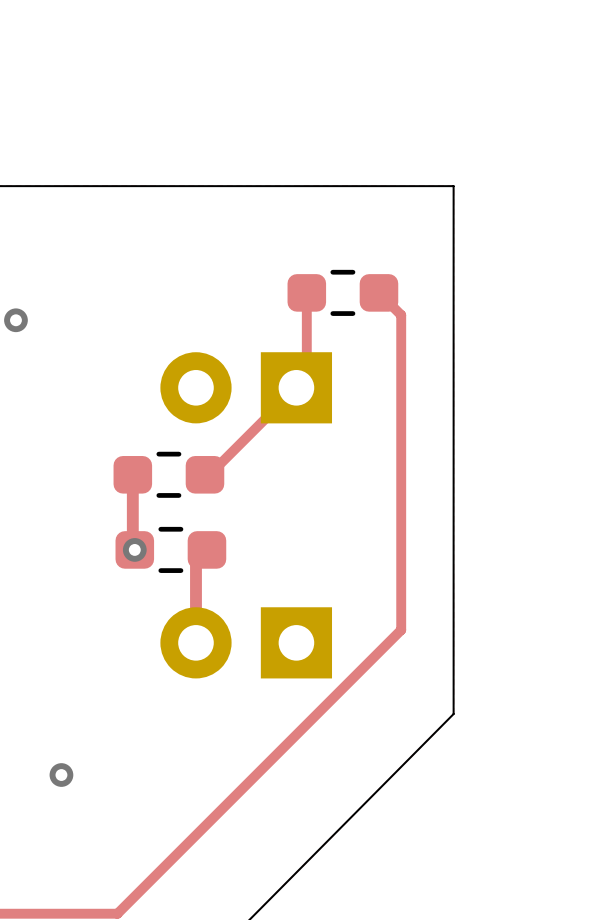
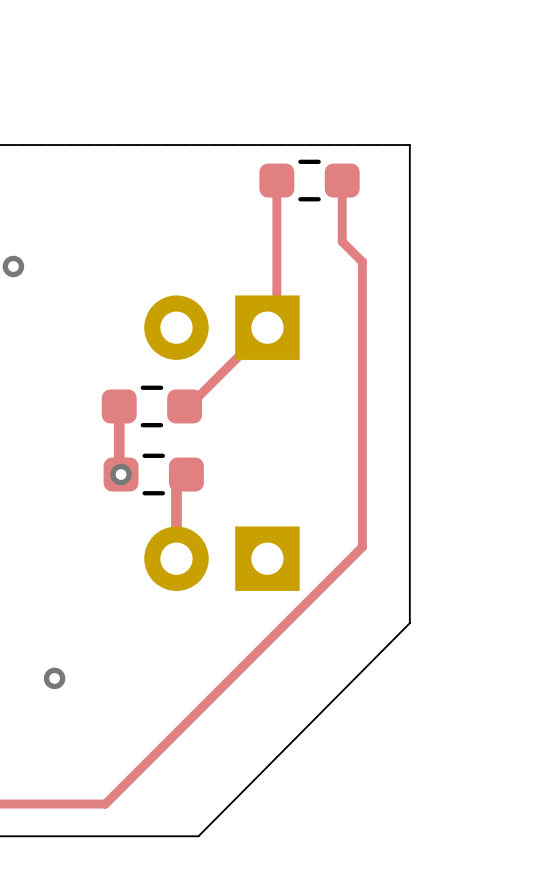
track: none -> (276, 180) (276, 241)
track: none -> (342, 180) (342, 241)
part position: (342, 292) -> (309, 180)

